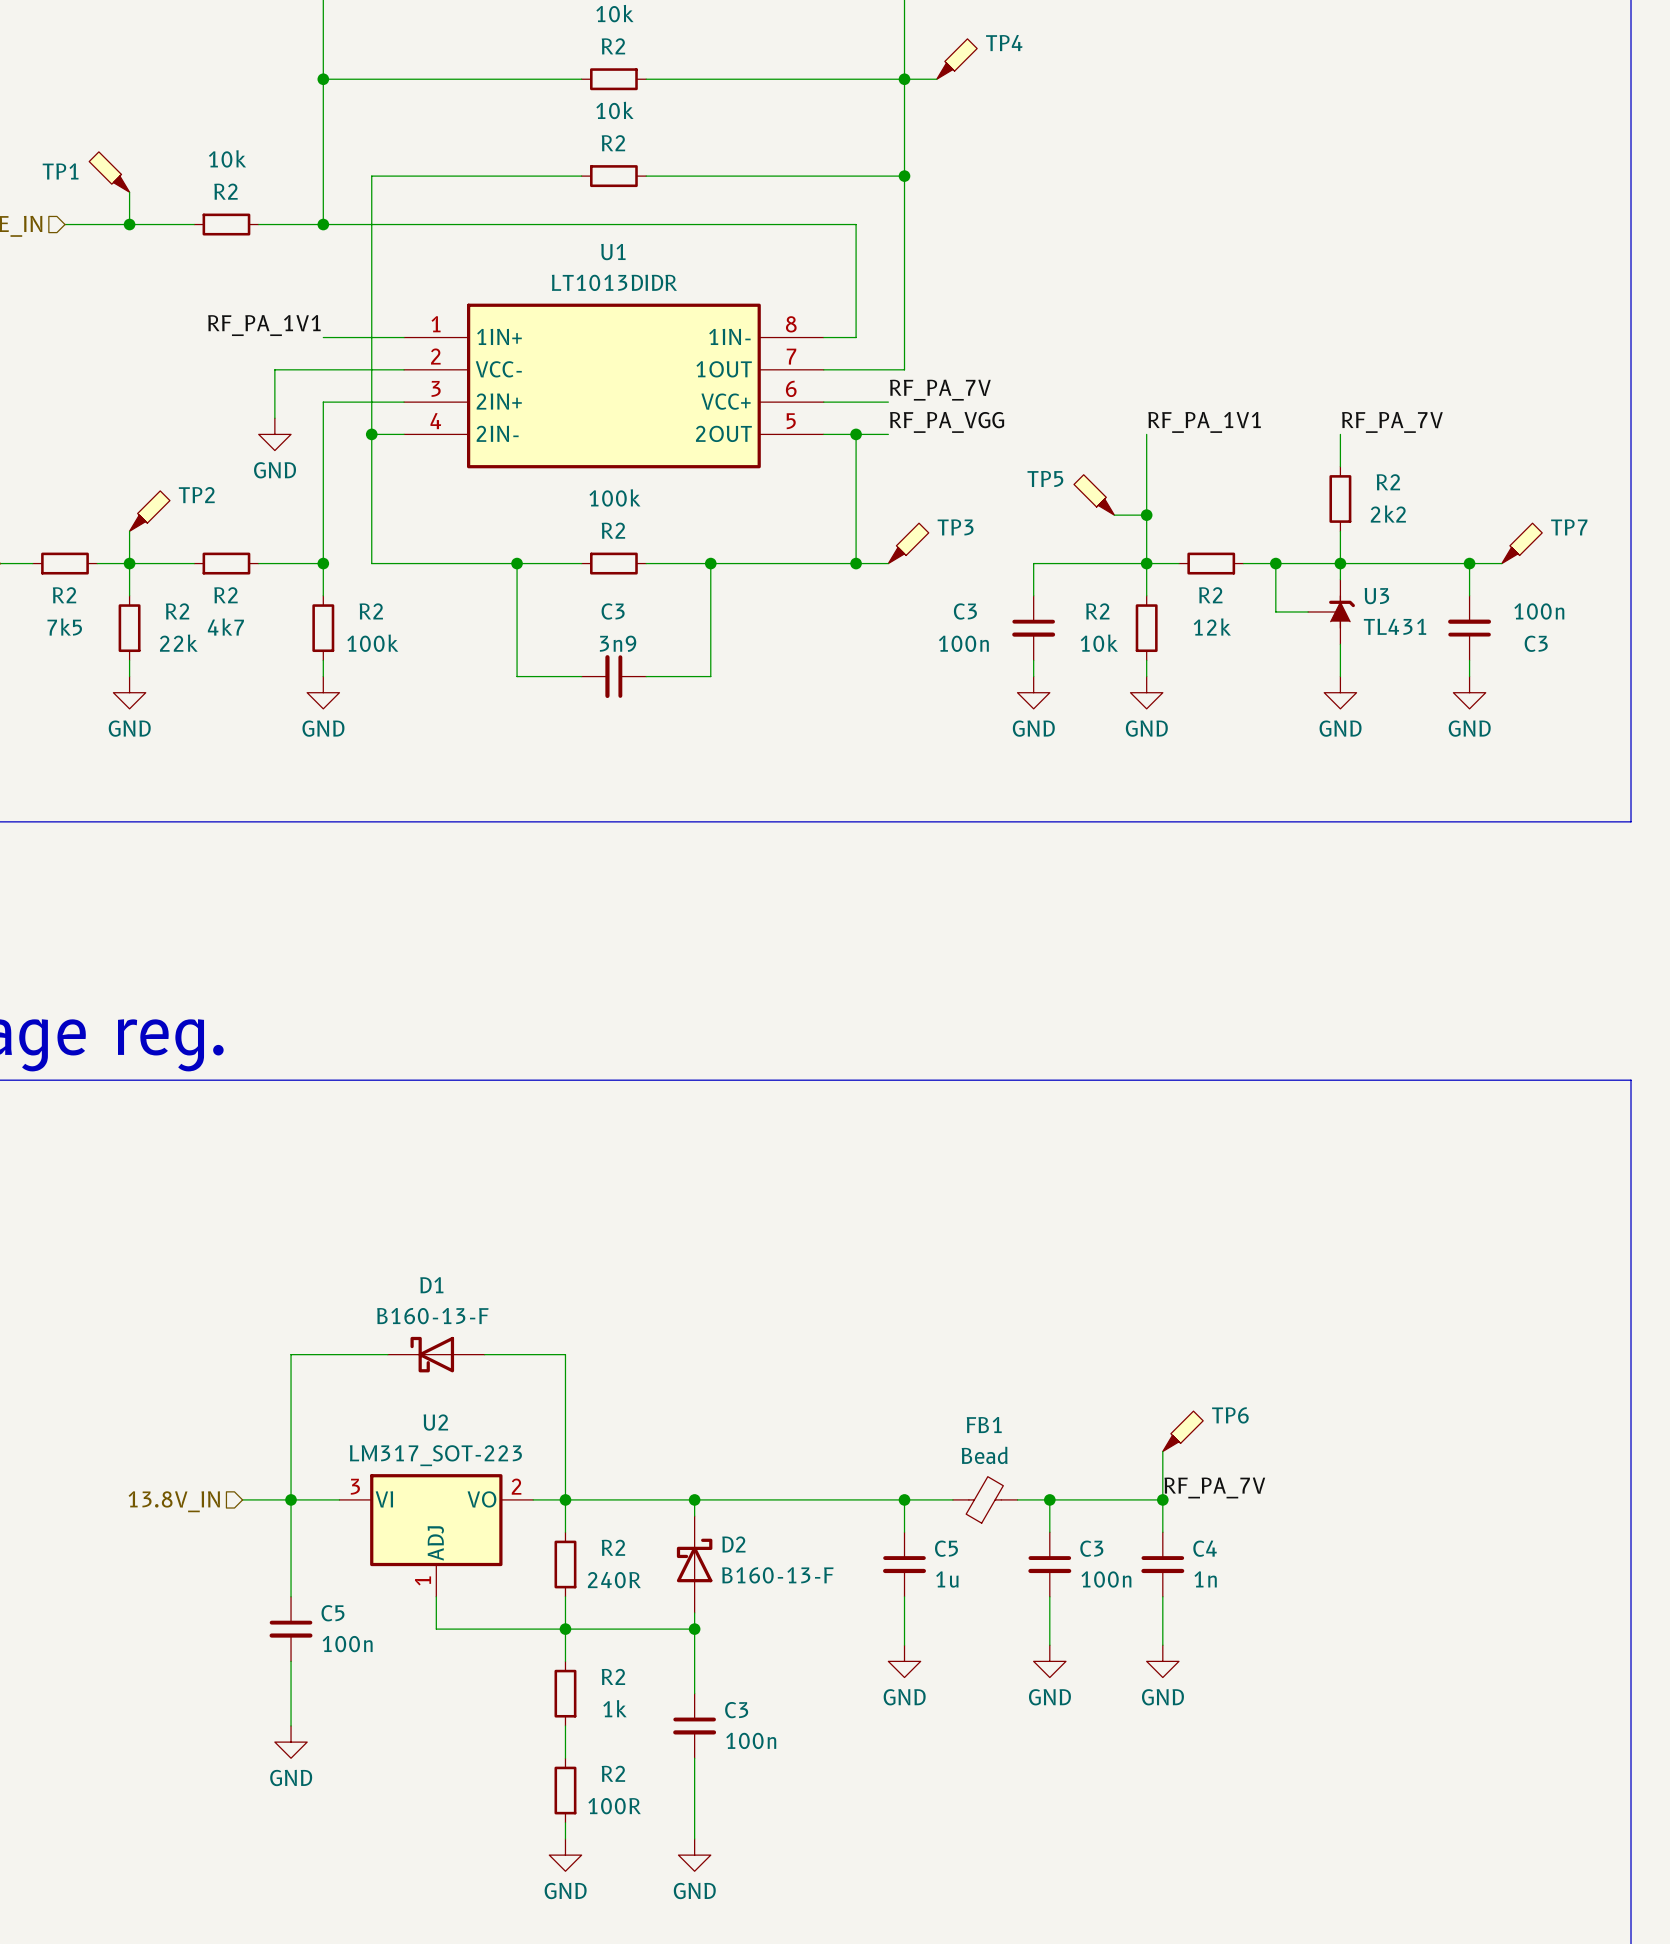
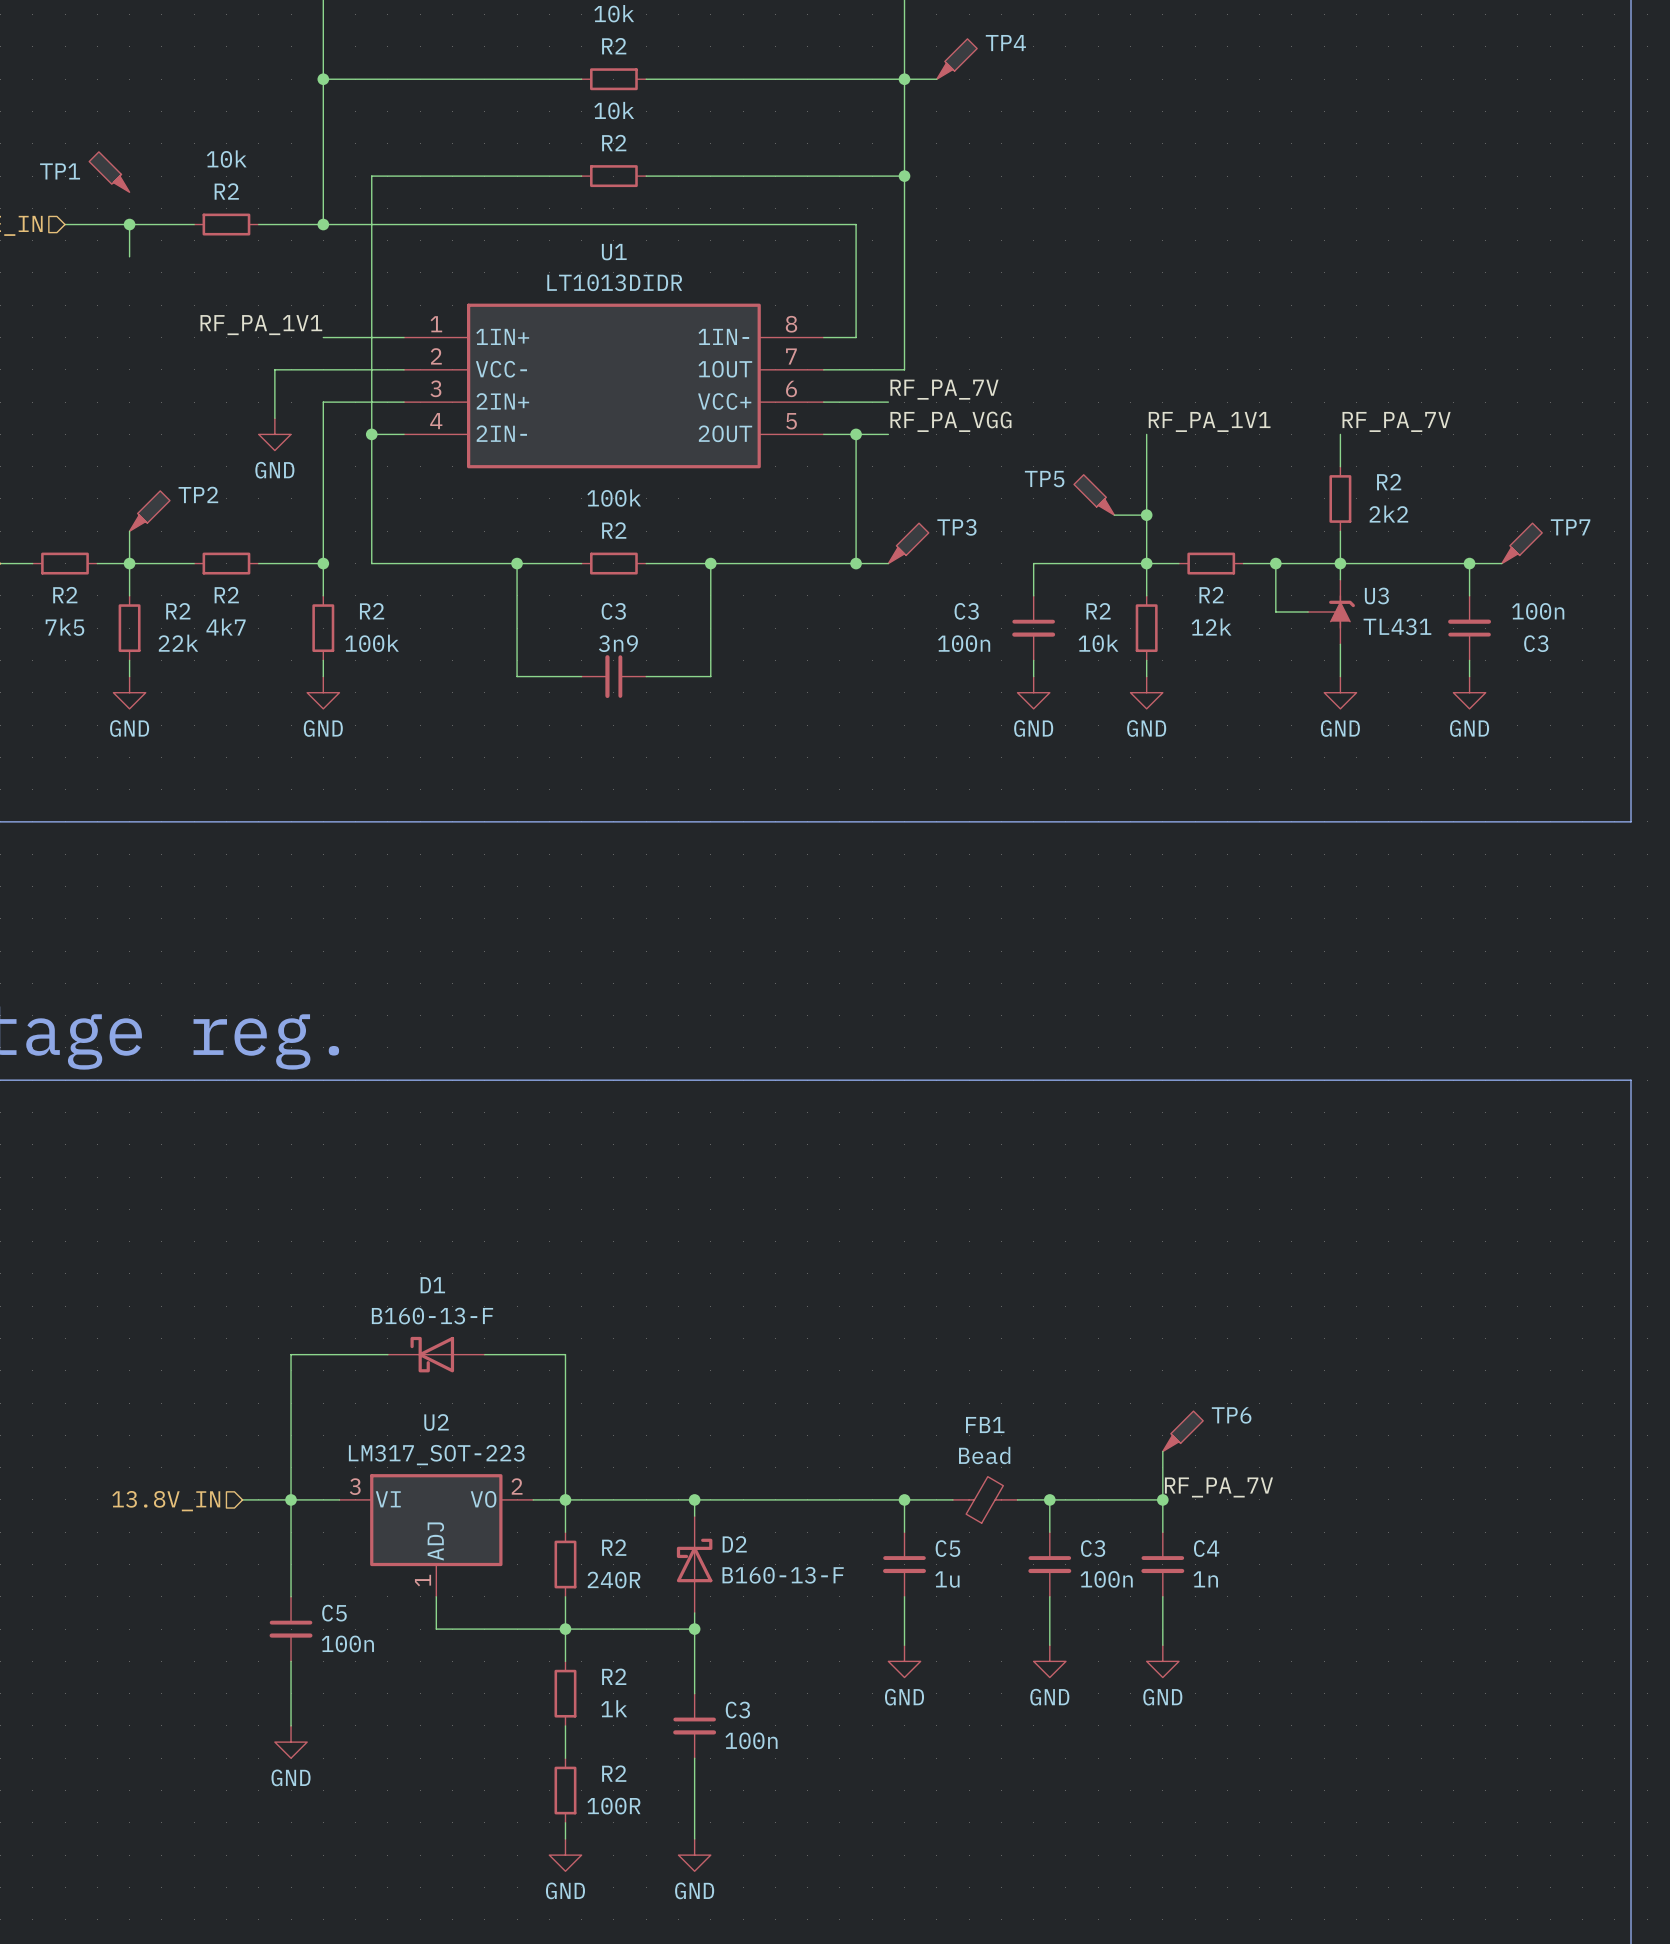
wire: (129, 192) (129, 224) -> (129, 256) (129, 224)

